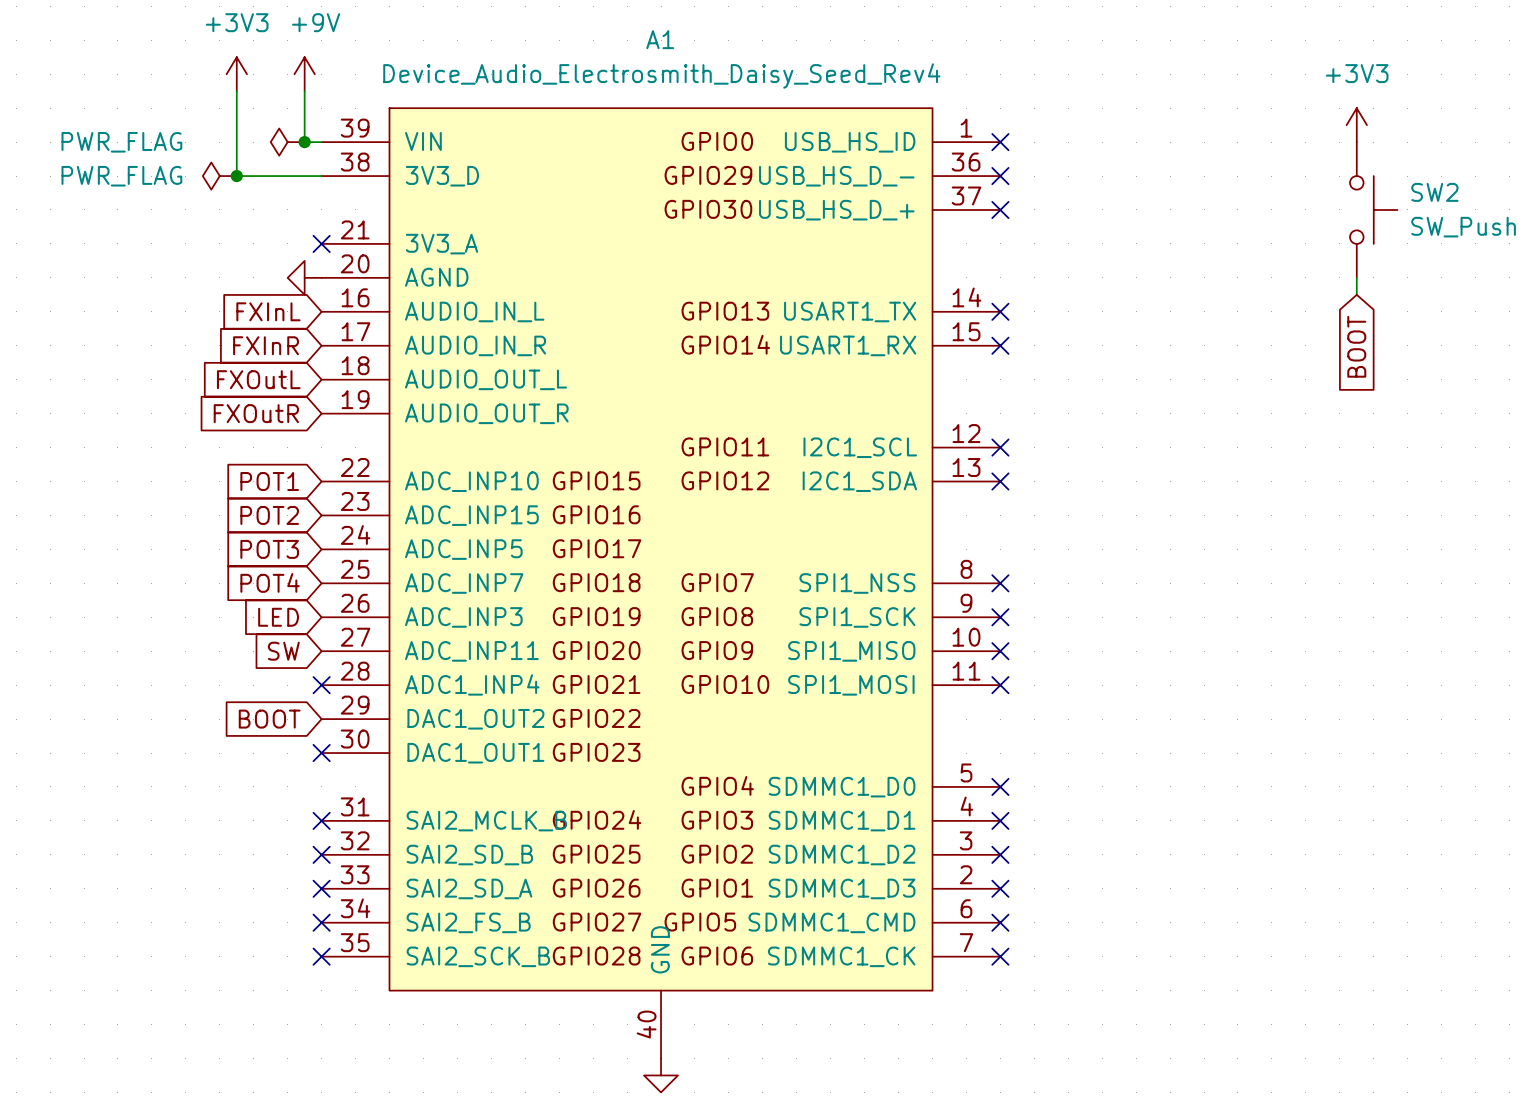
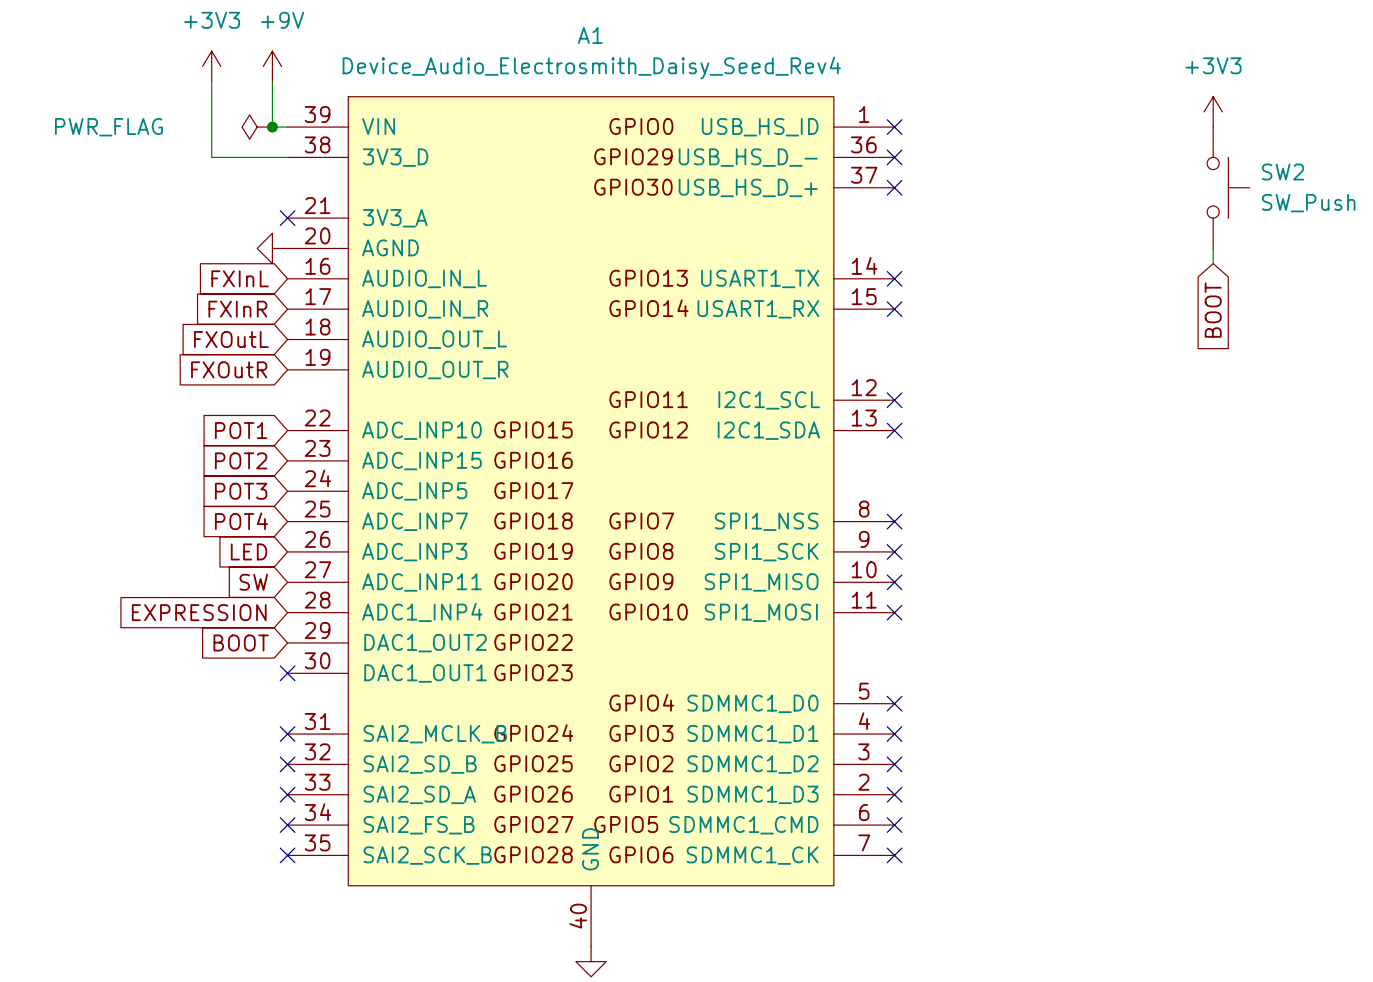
power symbol: PWR_FLAG (219, 176) -> none
junction: (236, 176) -> none
global label: none -> EXPRESSION (199, 612)
no-connect mark: (321, 685) -> none

